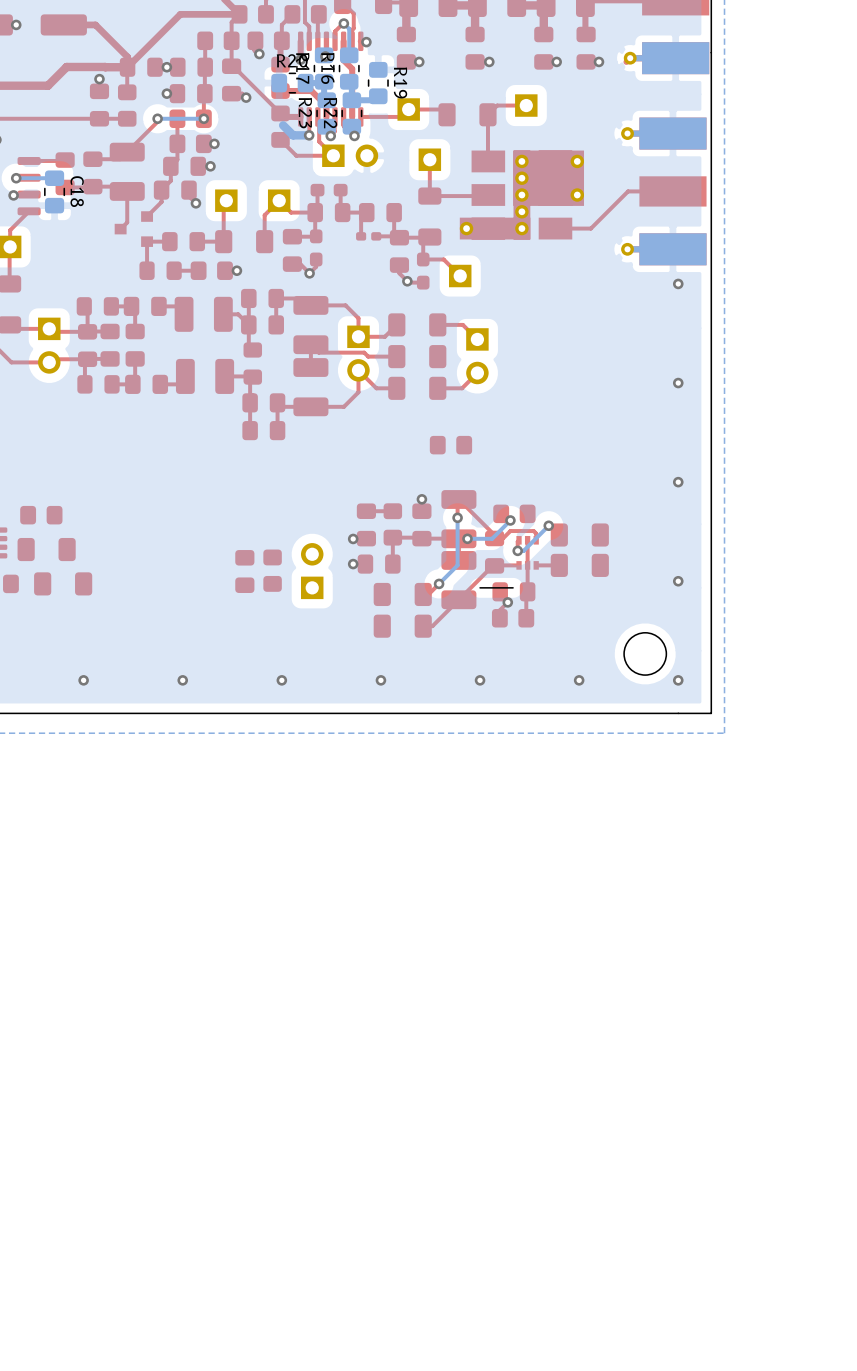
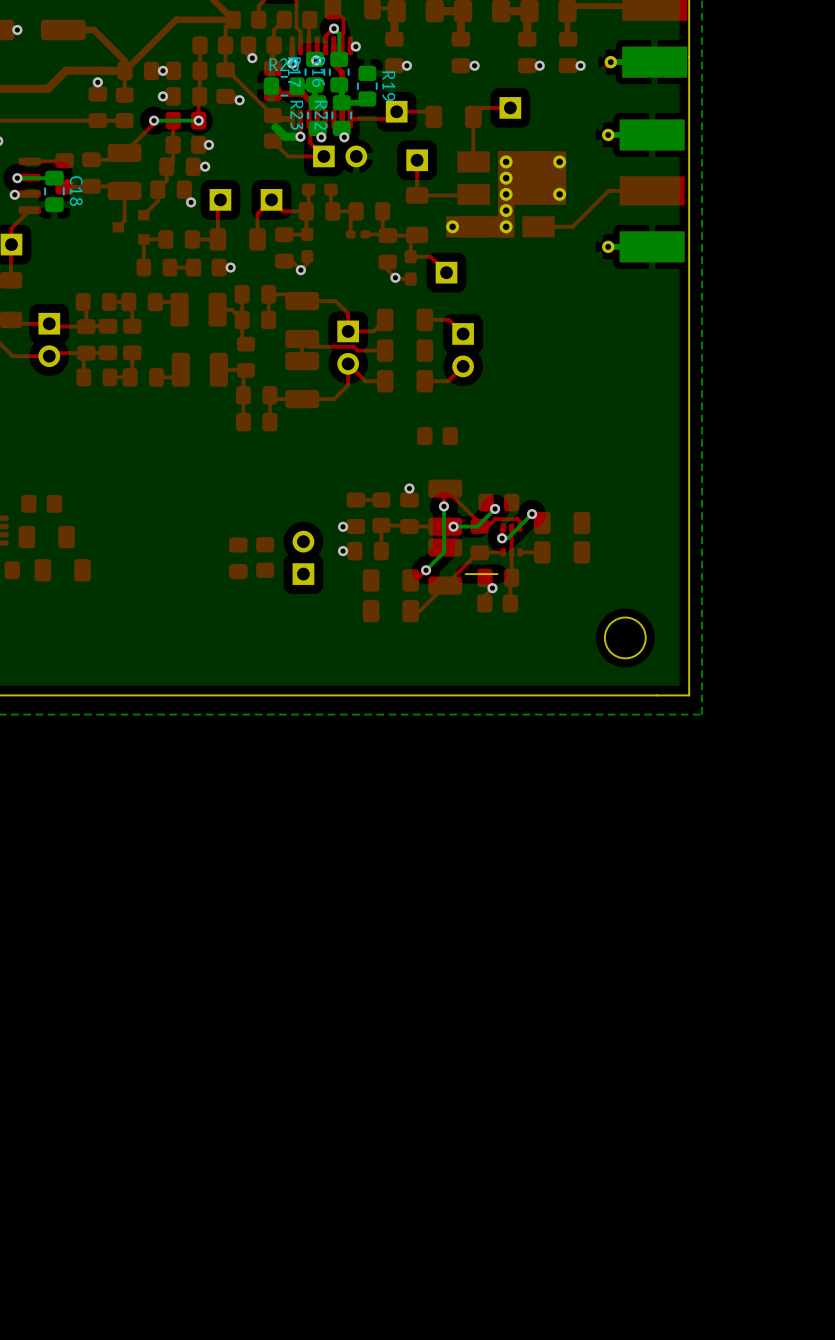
via: (678, 283) -> none
via: (678, 383) -> none
via: (678, 482) -> none
via: (678, 581) -> none
via: (83, 680) -> none
via: (182, 680) -> none
via: (281, 680) -> none
via: (380, 680) -> none
via: (480, 680) -> none
via: (579, 680) -> none
via: (678, 680) -> none

